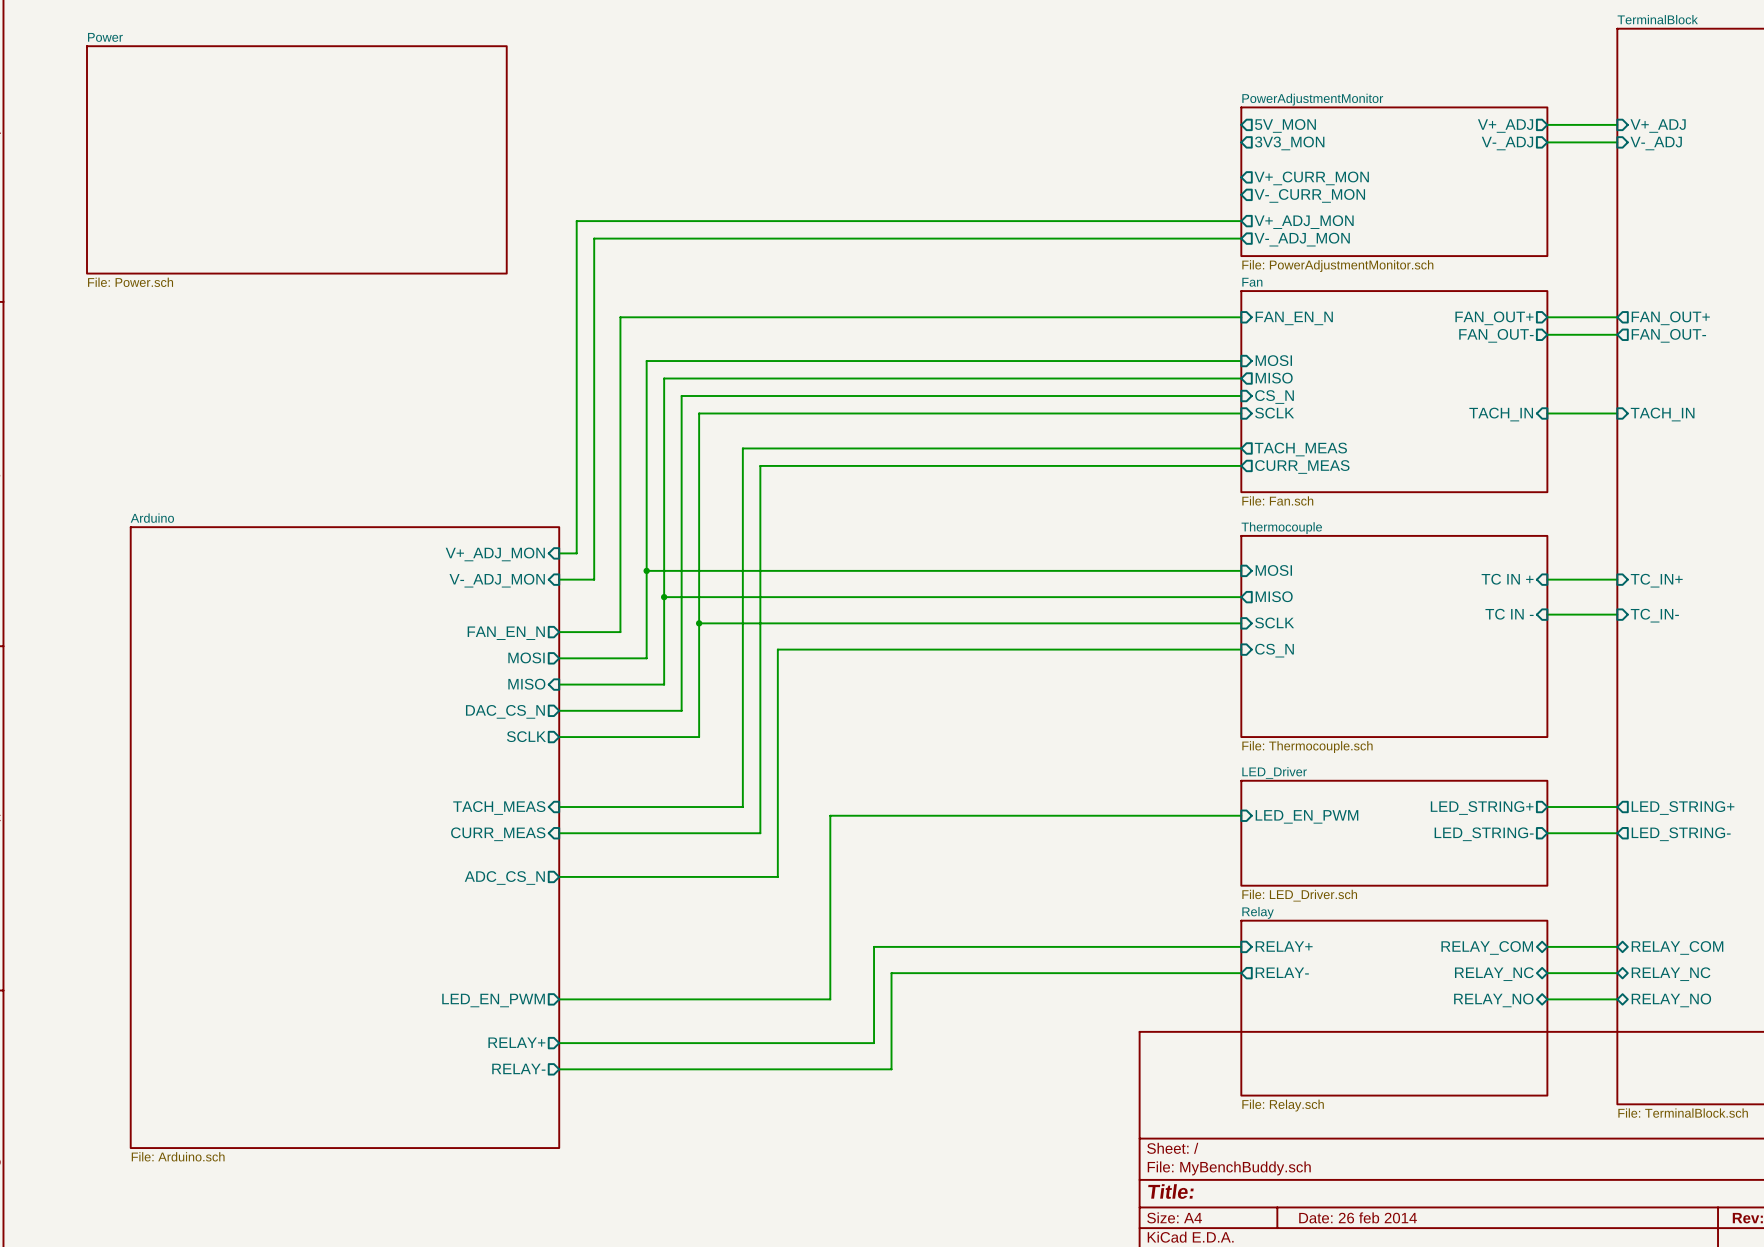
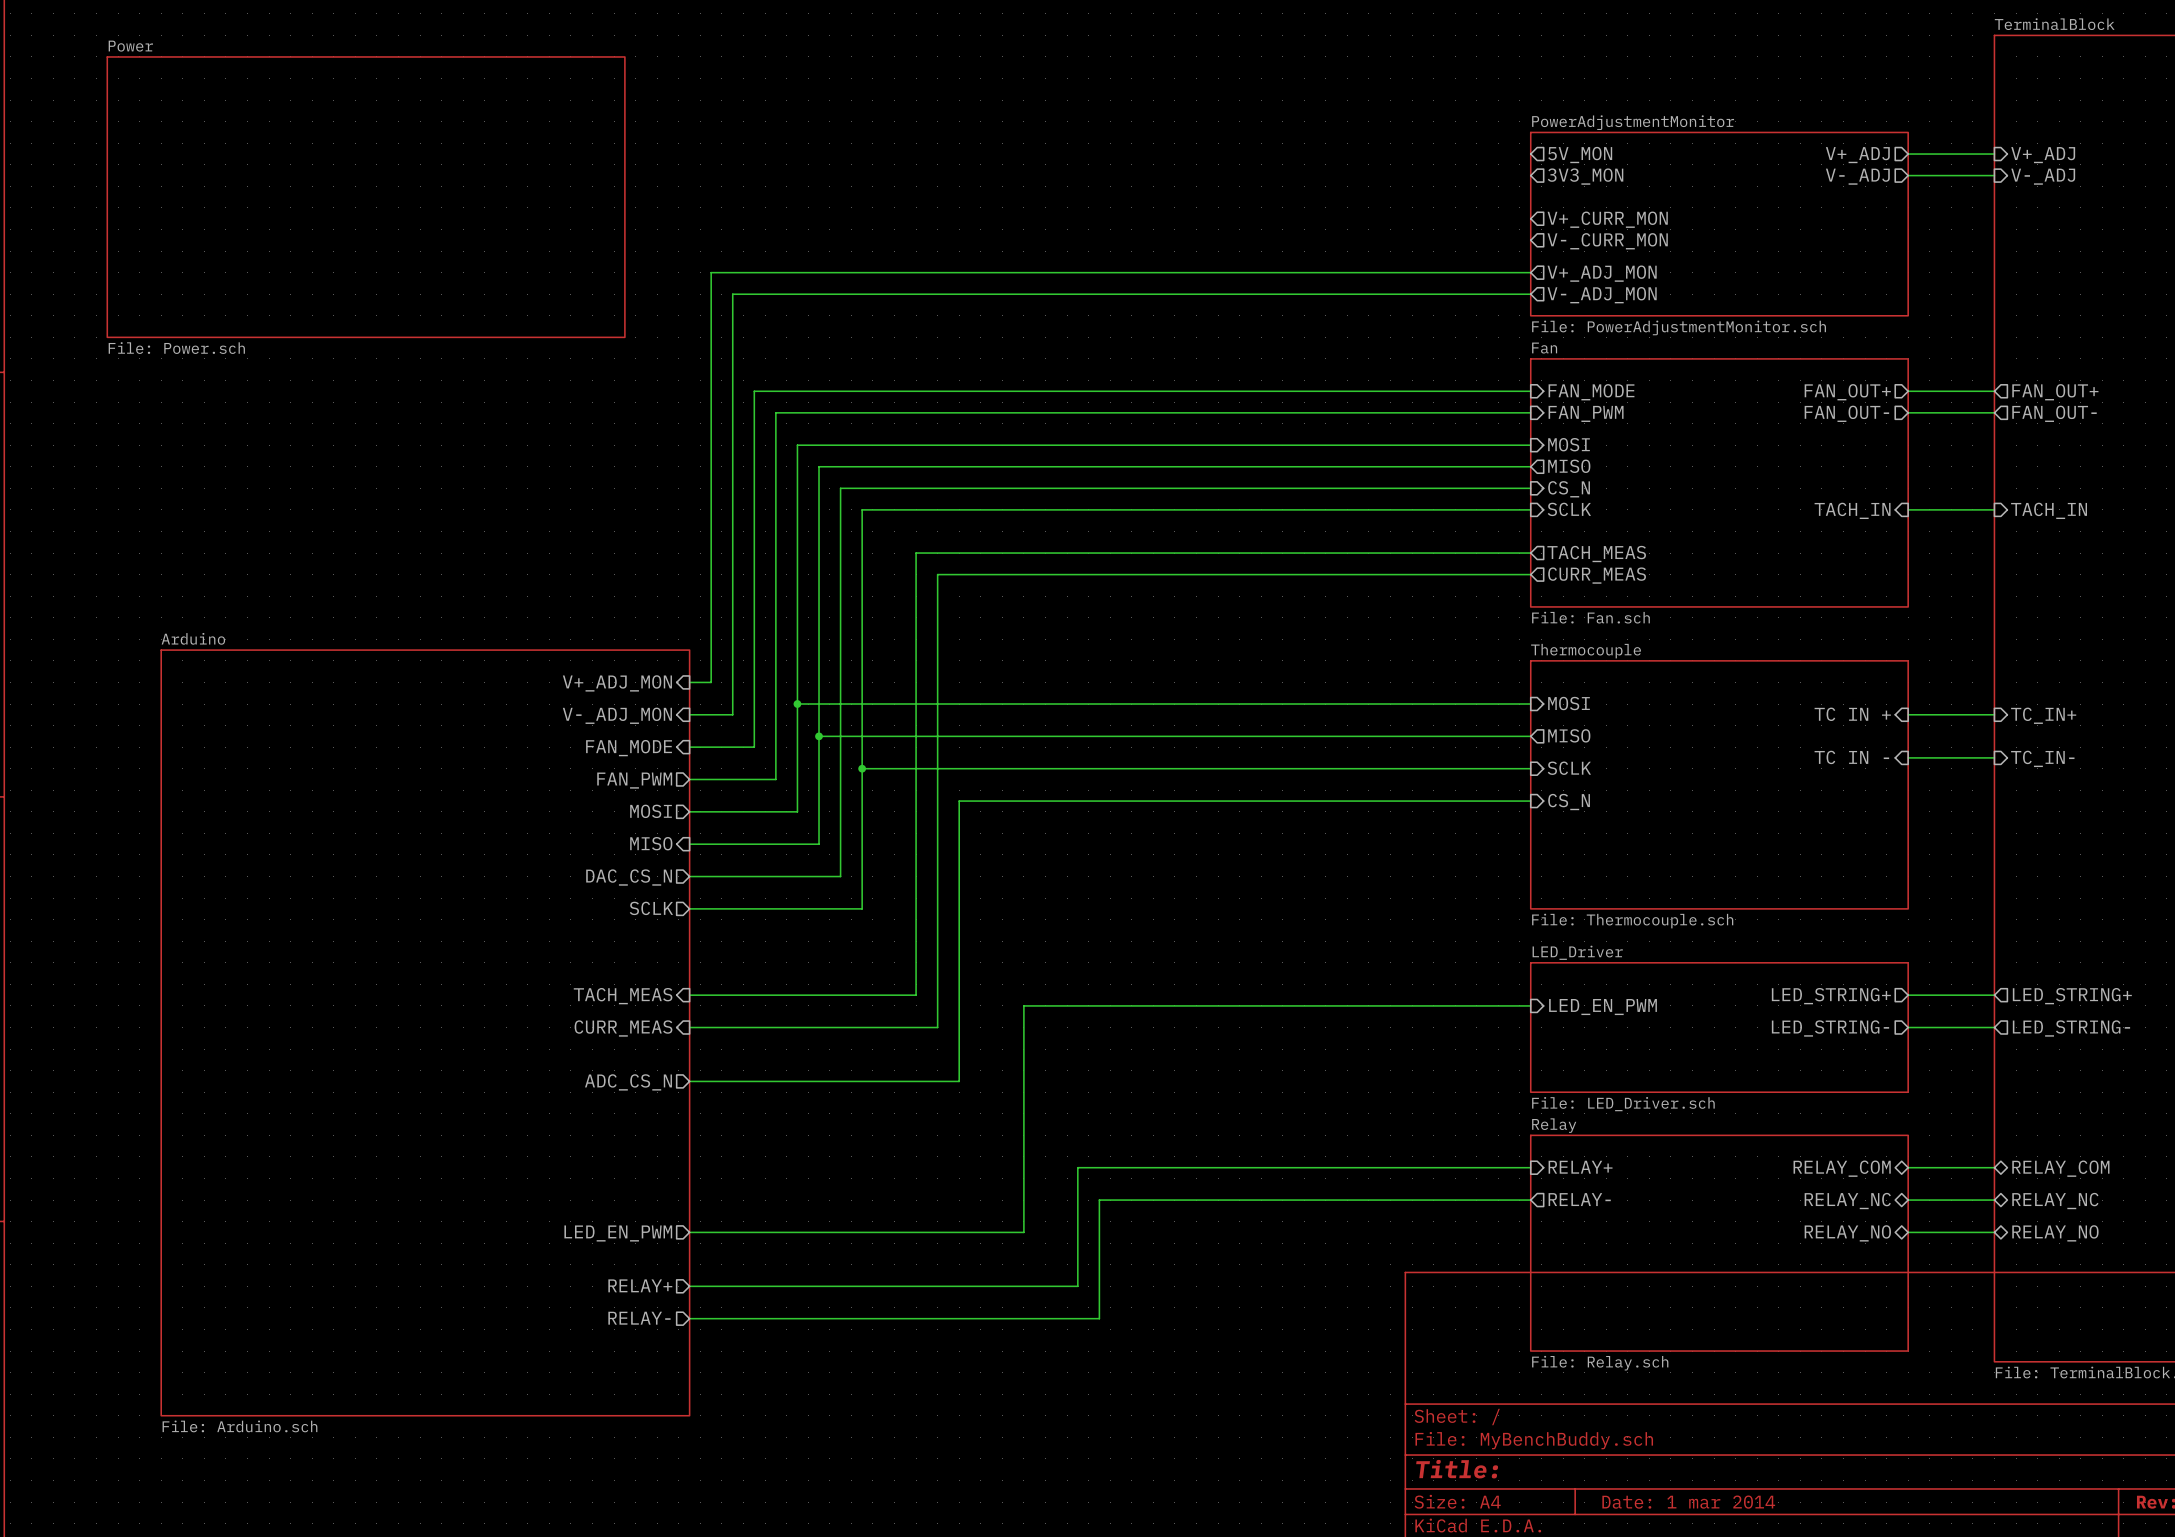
wire: (620, 317) (620, 632) -> (765, 391) (754, 391) (754, 747) (689, 747)
sheet pin: FAN_EN_N (1294, 318) -> FAN_MODE (1591, 392)
wire: none -> (1530, 412) (775, 412) (775, 779) (765, 779)
sheet pin: none -> FAN_PWM (1586, 413)
sheet pin: none -> FAN_MODE (629, 748)
sheet pin: FAN_EN_N (506, 633) -> FAN_PWM (634, 780)
title block: Date: 26 feb 2014 (1358, 1217) -> Date: 1 mar 2014 (1688, 1502)

